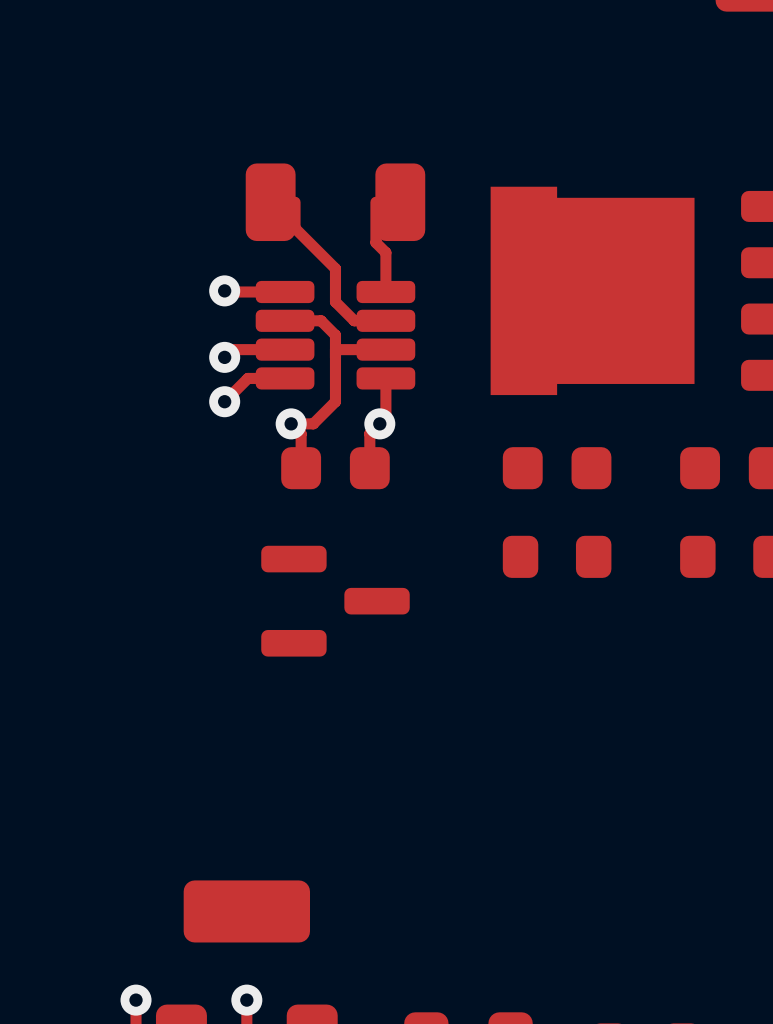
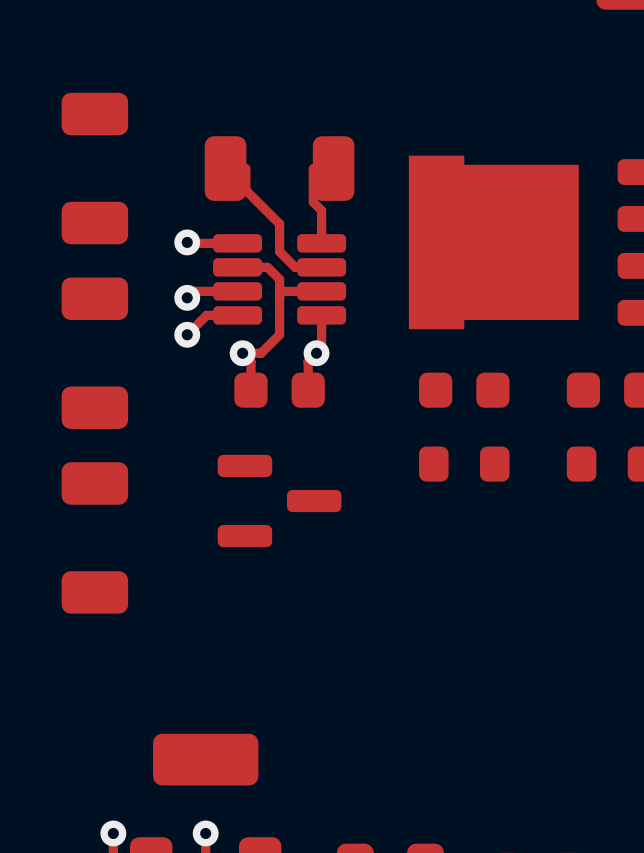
part: none -> (94, 168)
part: none -> (94, 353)
part: none -> (94, 537)

